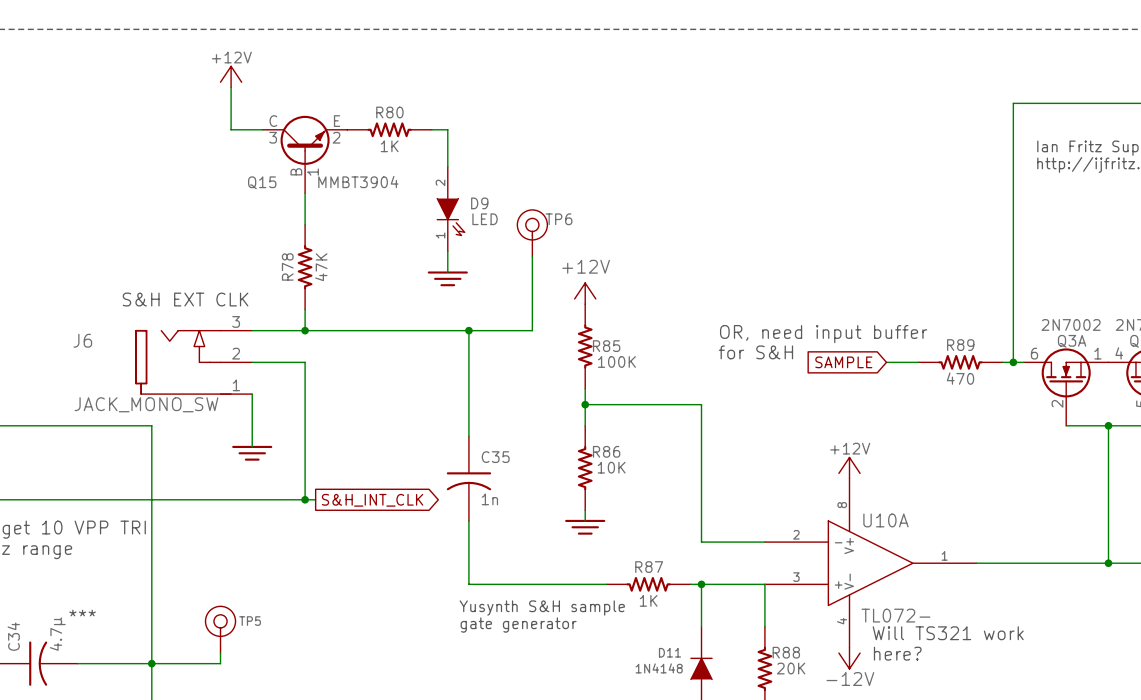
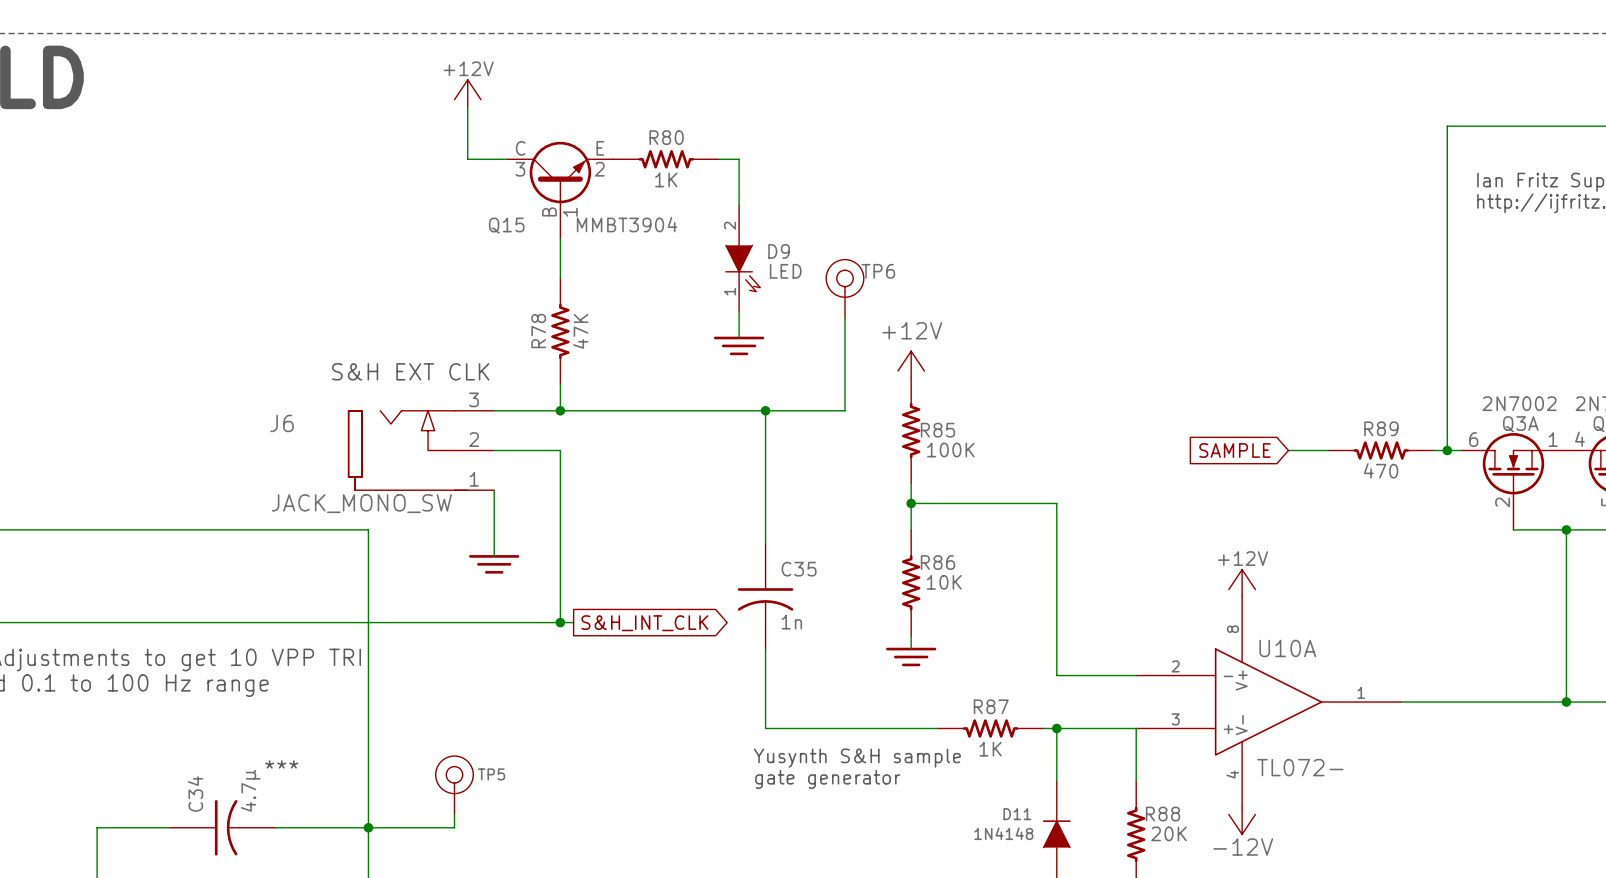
text: OR, need input buffer (823, 334) -> none
text: for S&H (755, 352) -> none
text: Will TS321 work (948, 633) -> none
text: here? (897, 653) -> none

